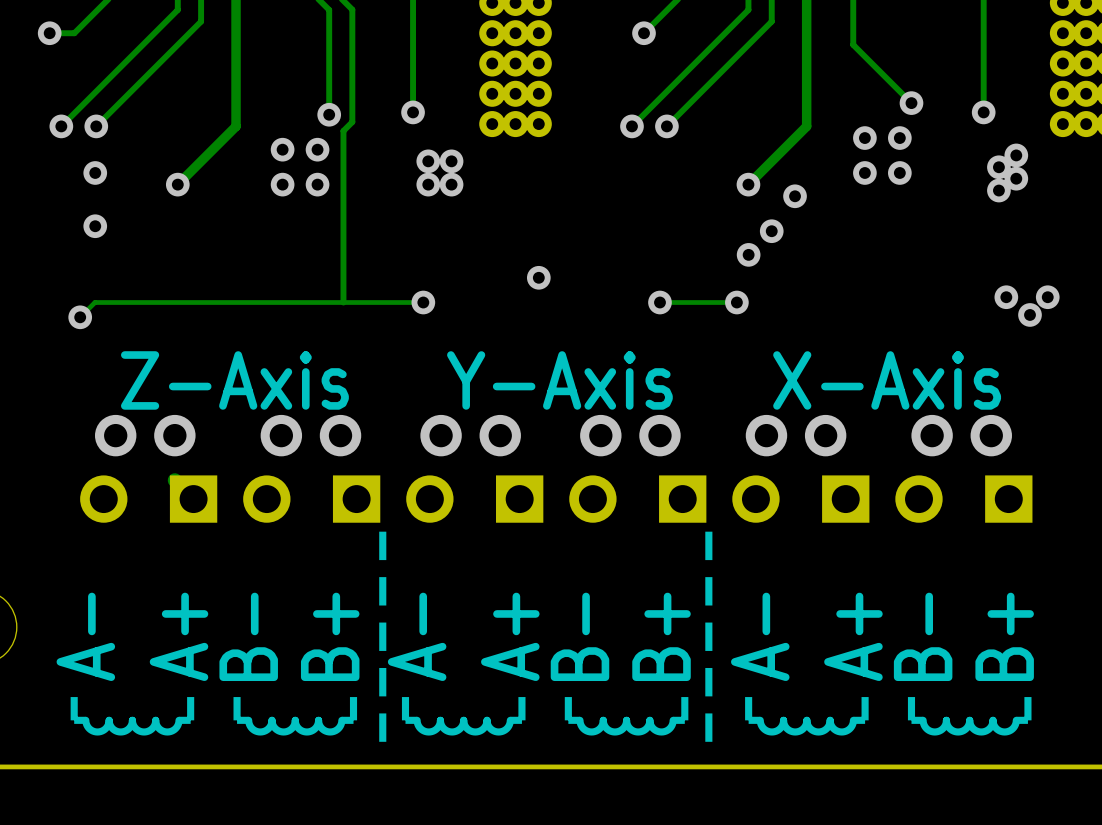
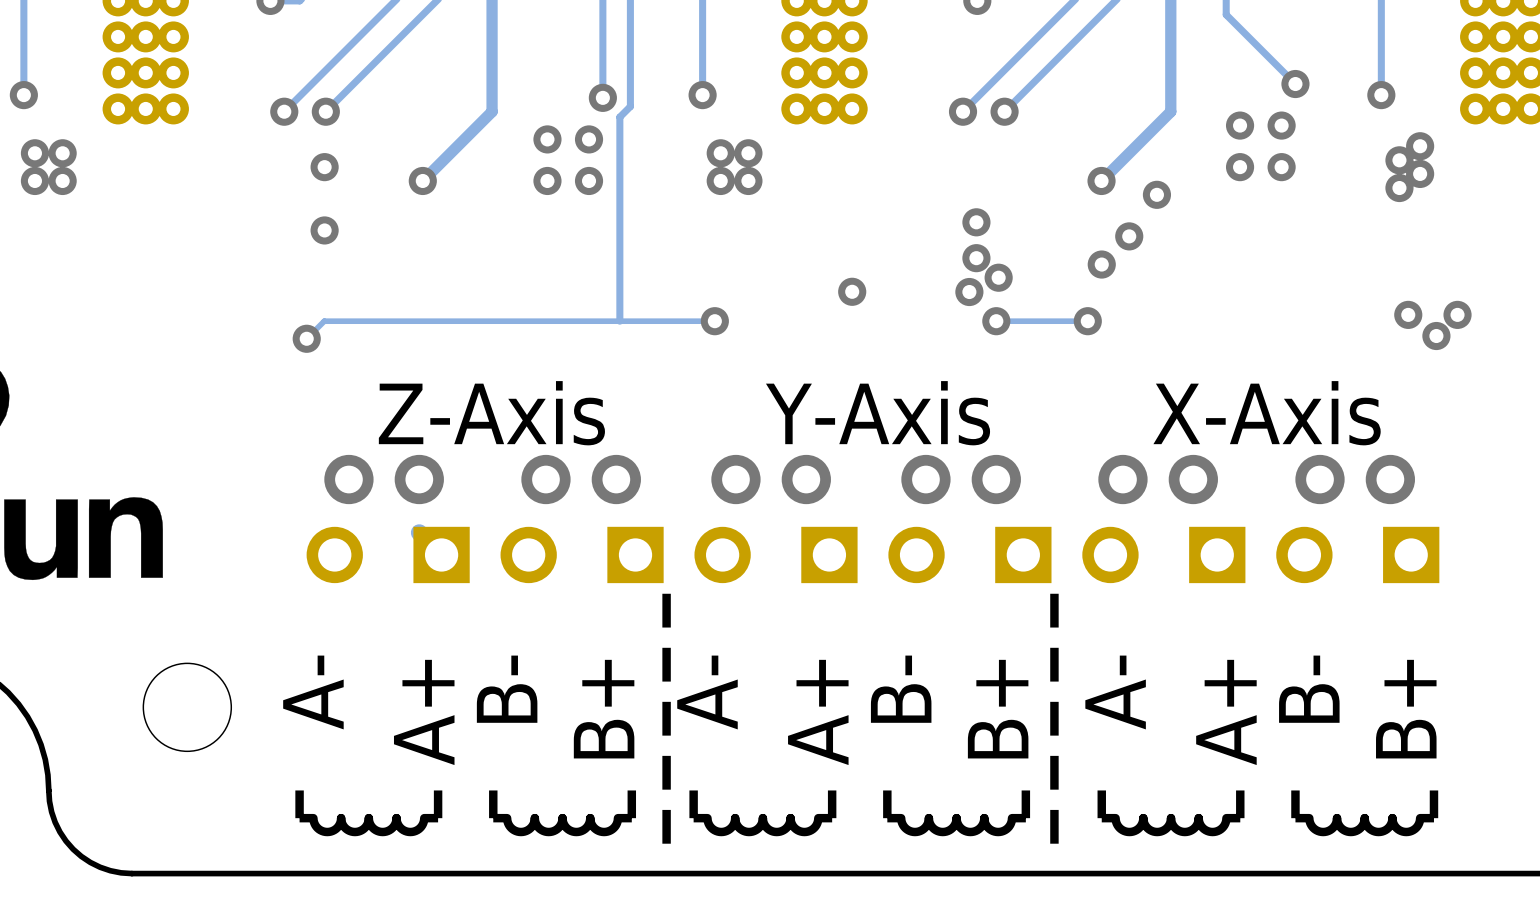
via: none -> (976, 222)
via: none -> (976, 258)
via: none -> (998, 277)
via: none -> (969, 292)

